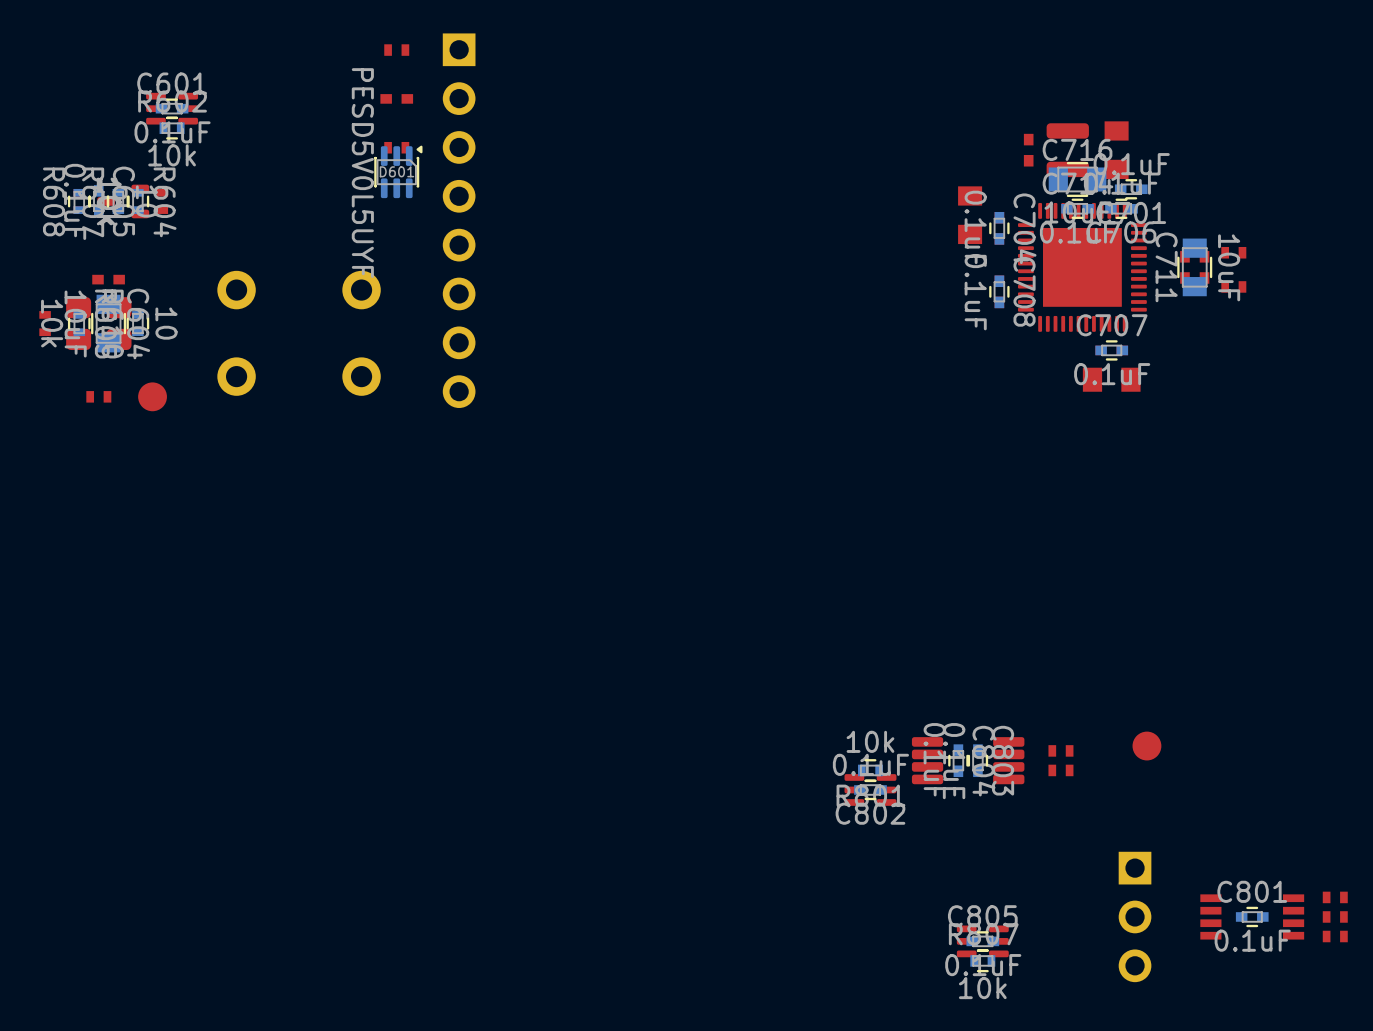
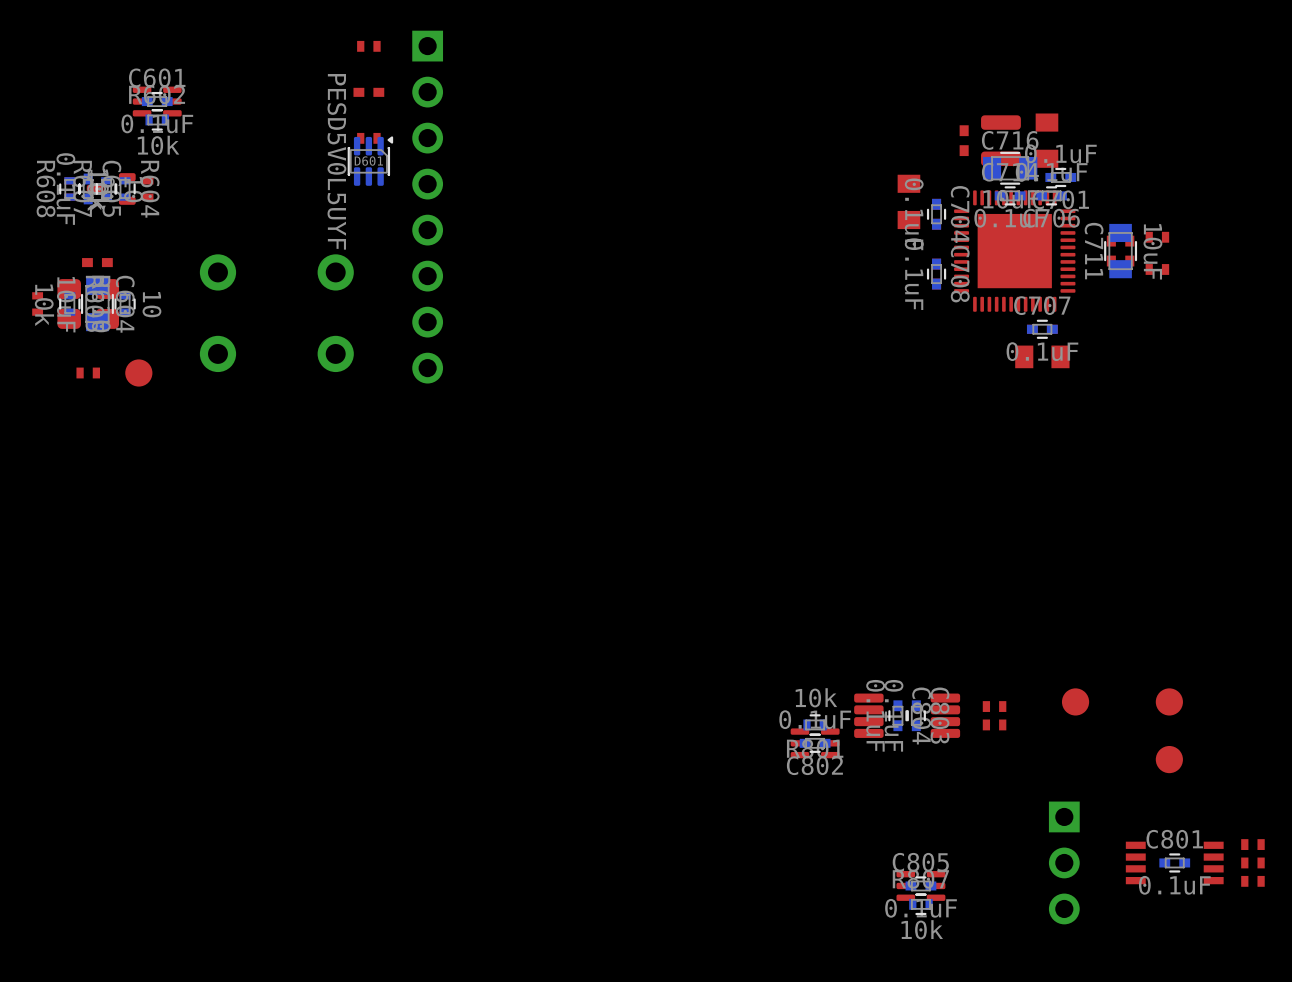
part: none -> (1169, 701)
part: none -> (1169, 759)

